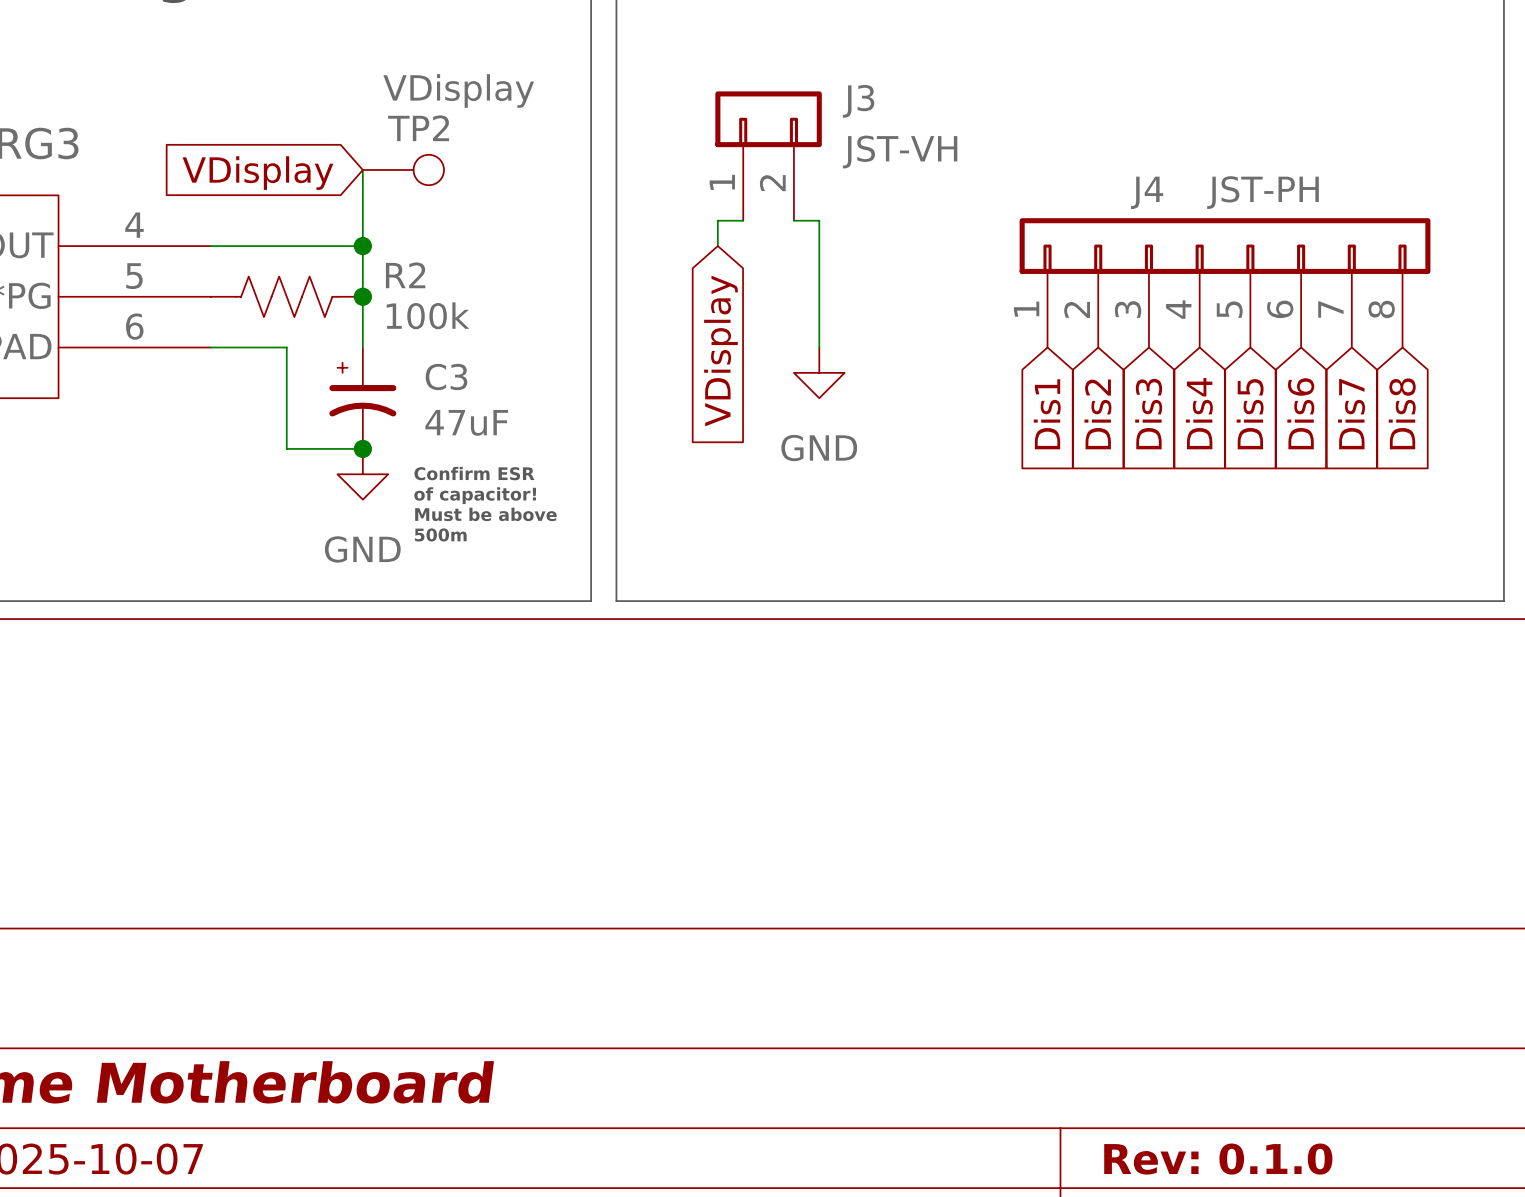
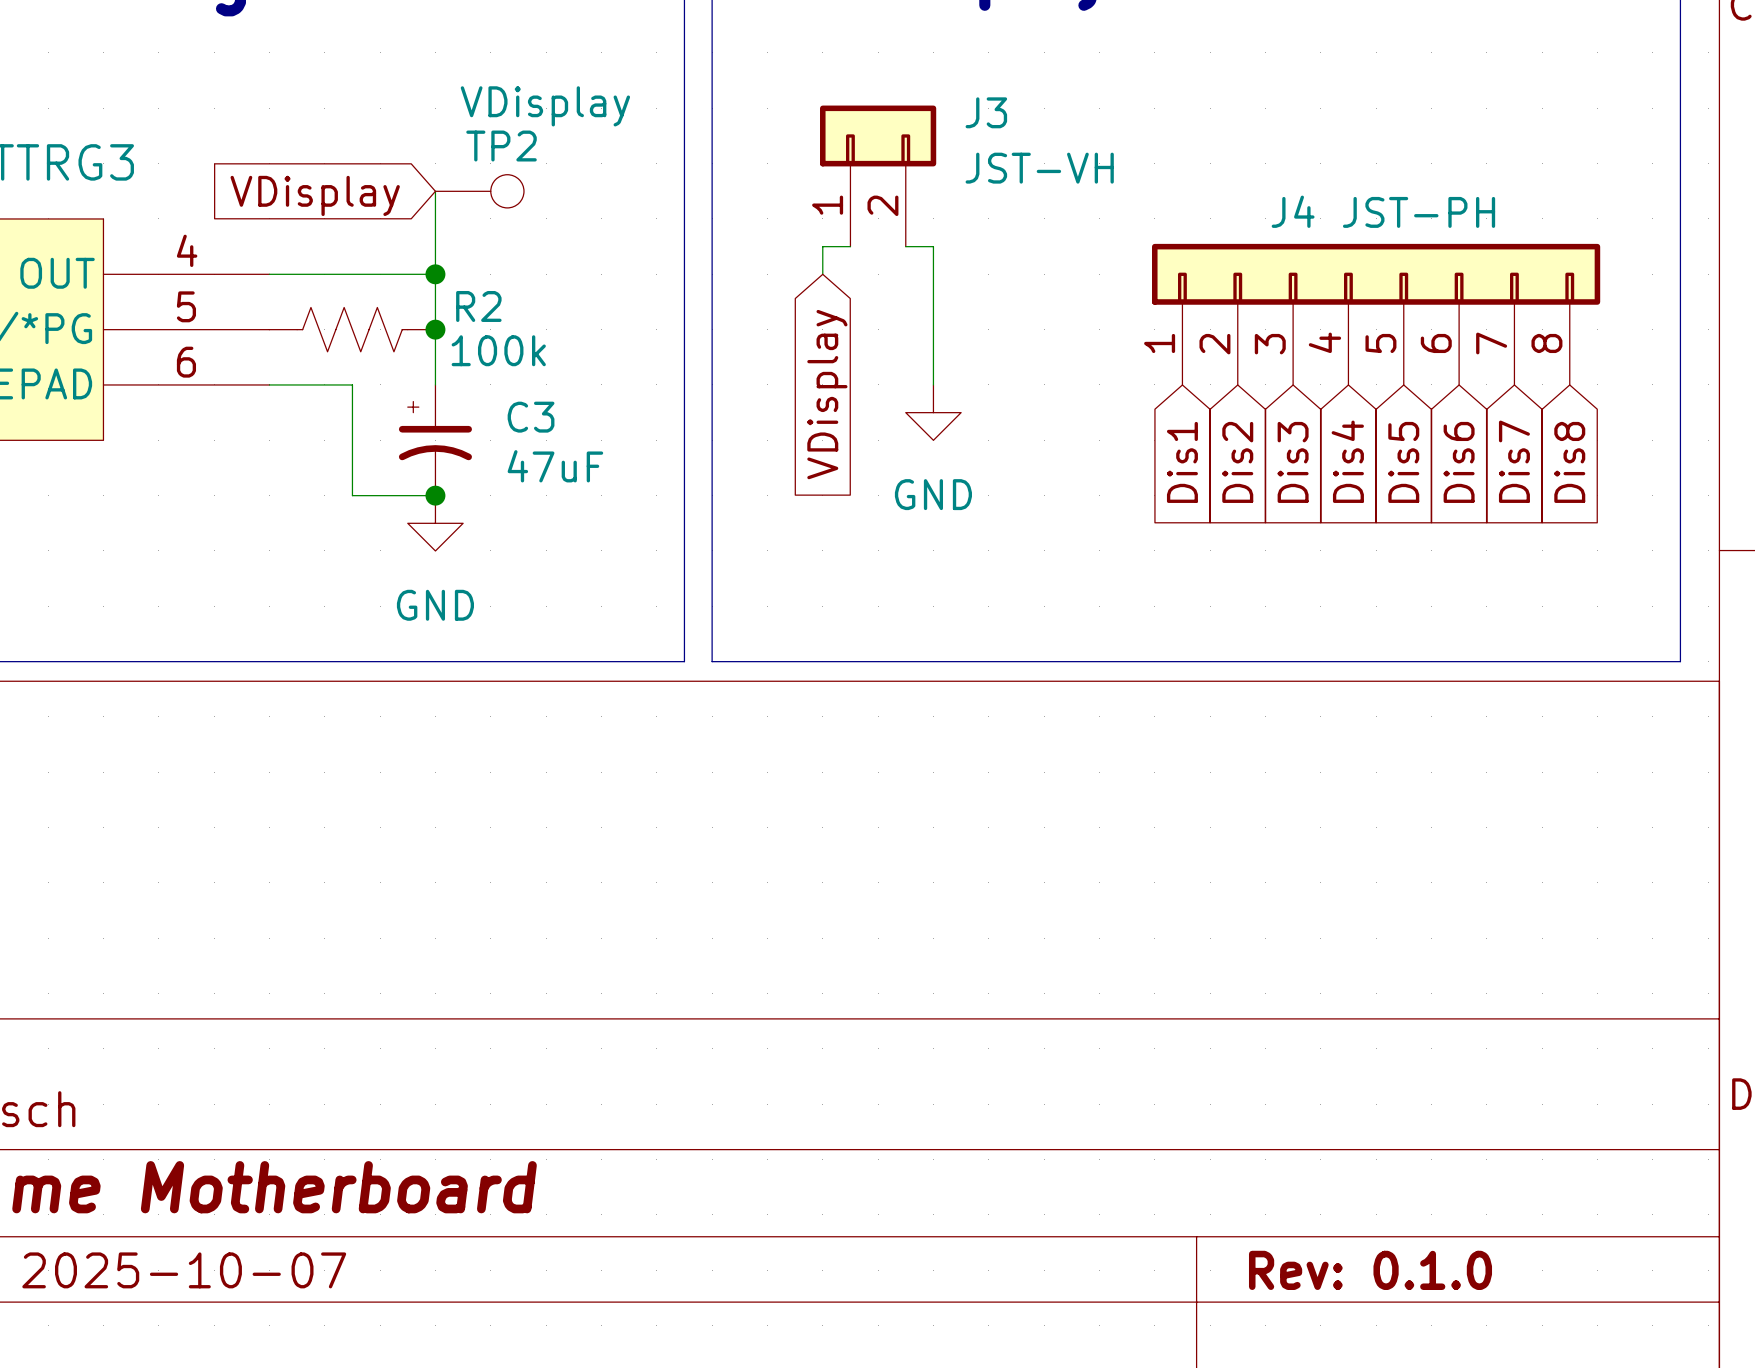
text: Confirm ESR (474, 473) -> none
text: of capacitor! (475, 495) -> none
text: Must be above (485, 514) -> none
text: 500m (440, 534) -> none

